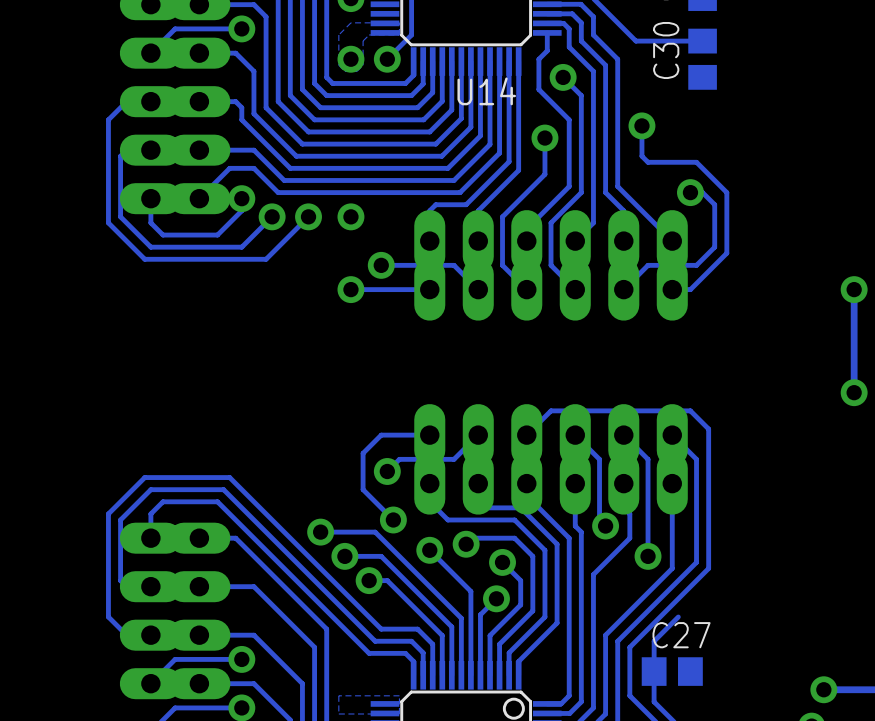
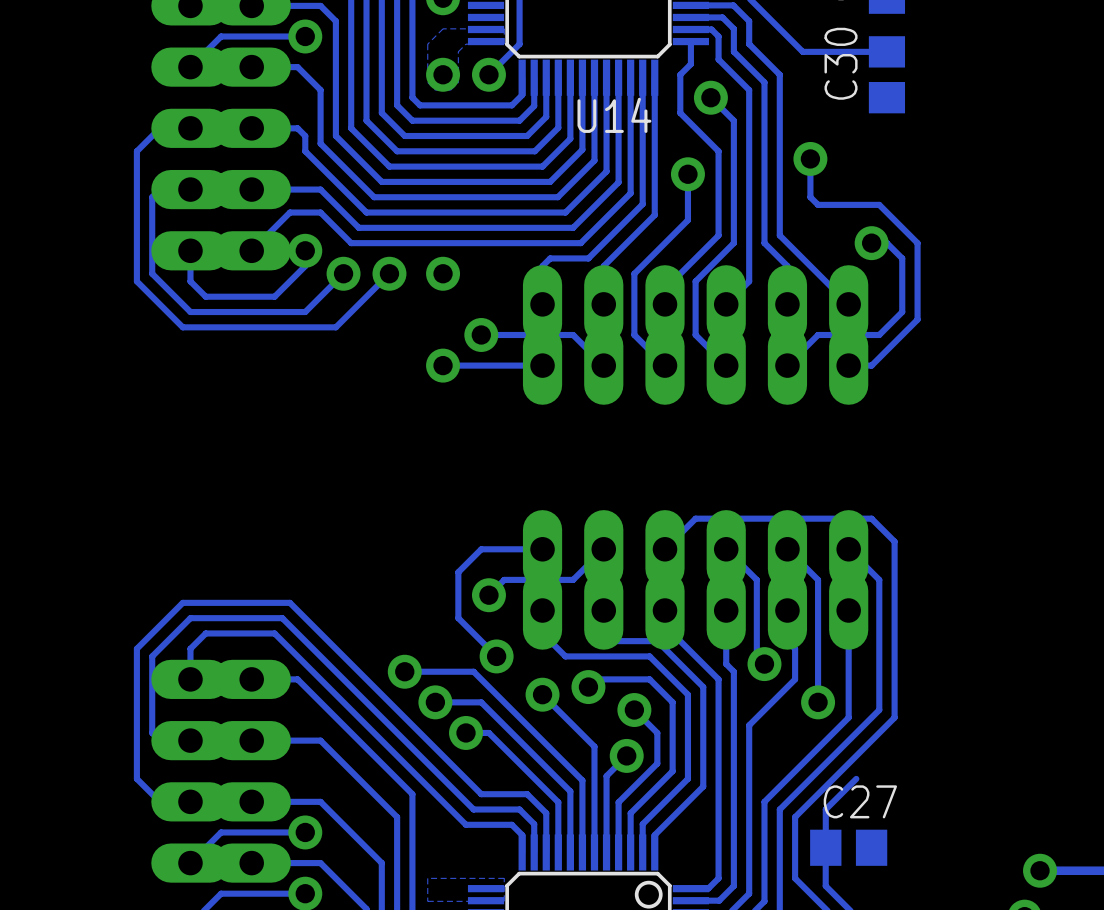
track: (854, 289) (854, 392) -> none
via: (854, 289) -> none
via: (854, 392) -> none

